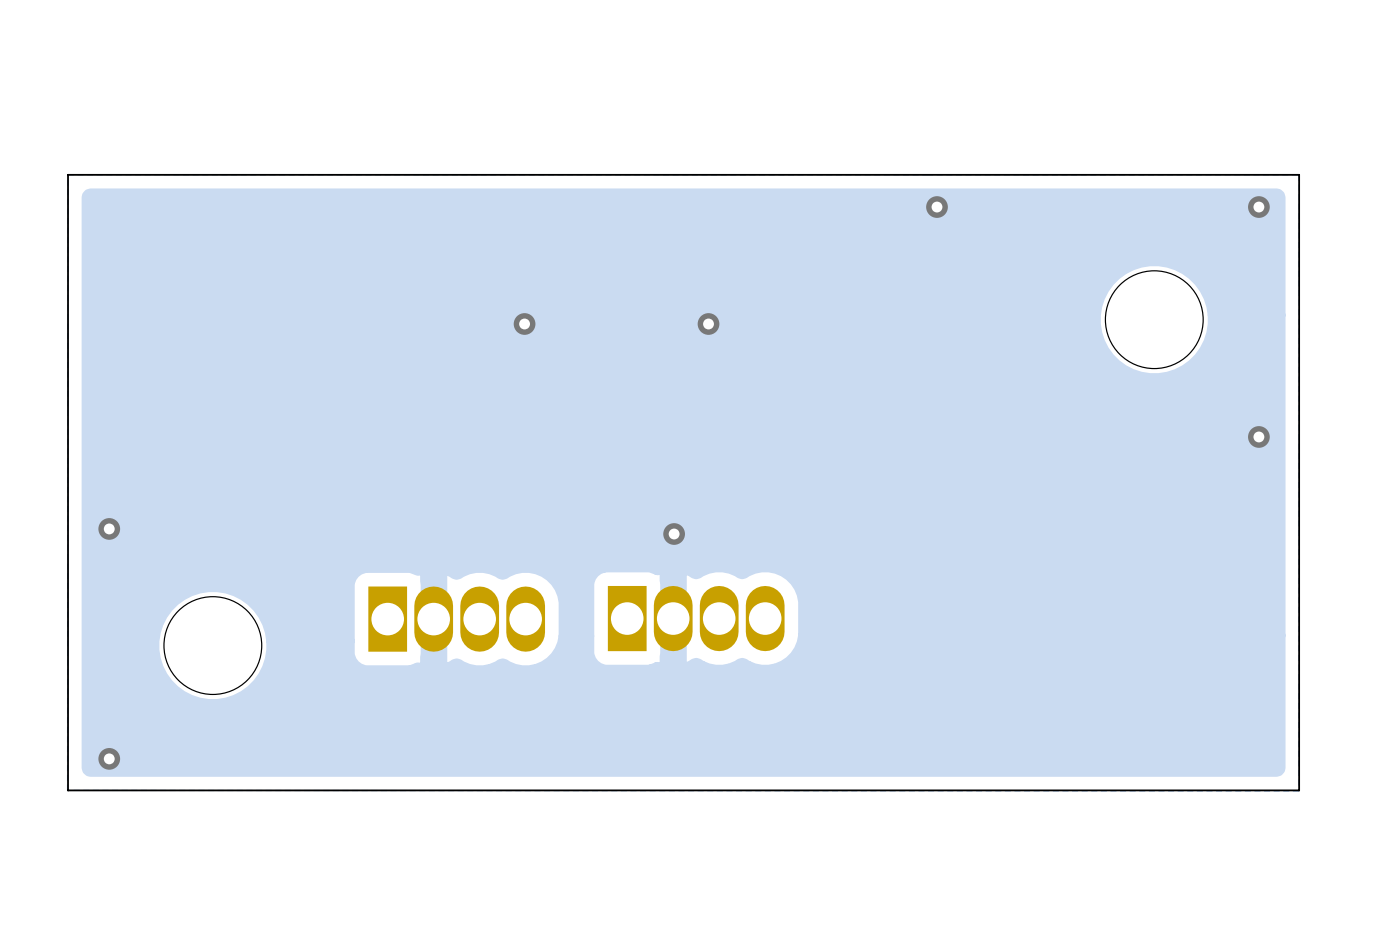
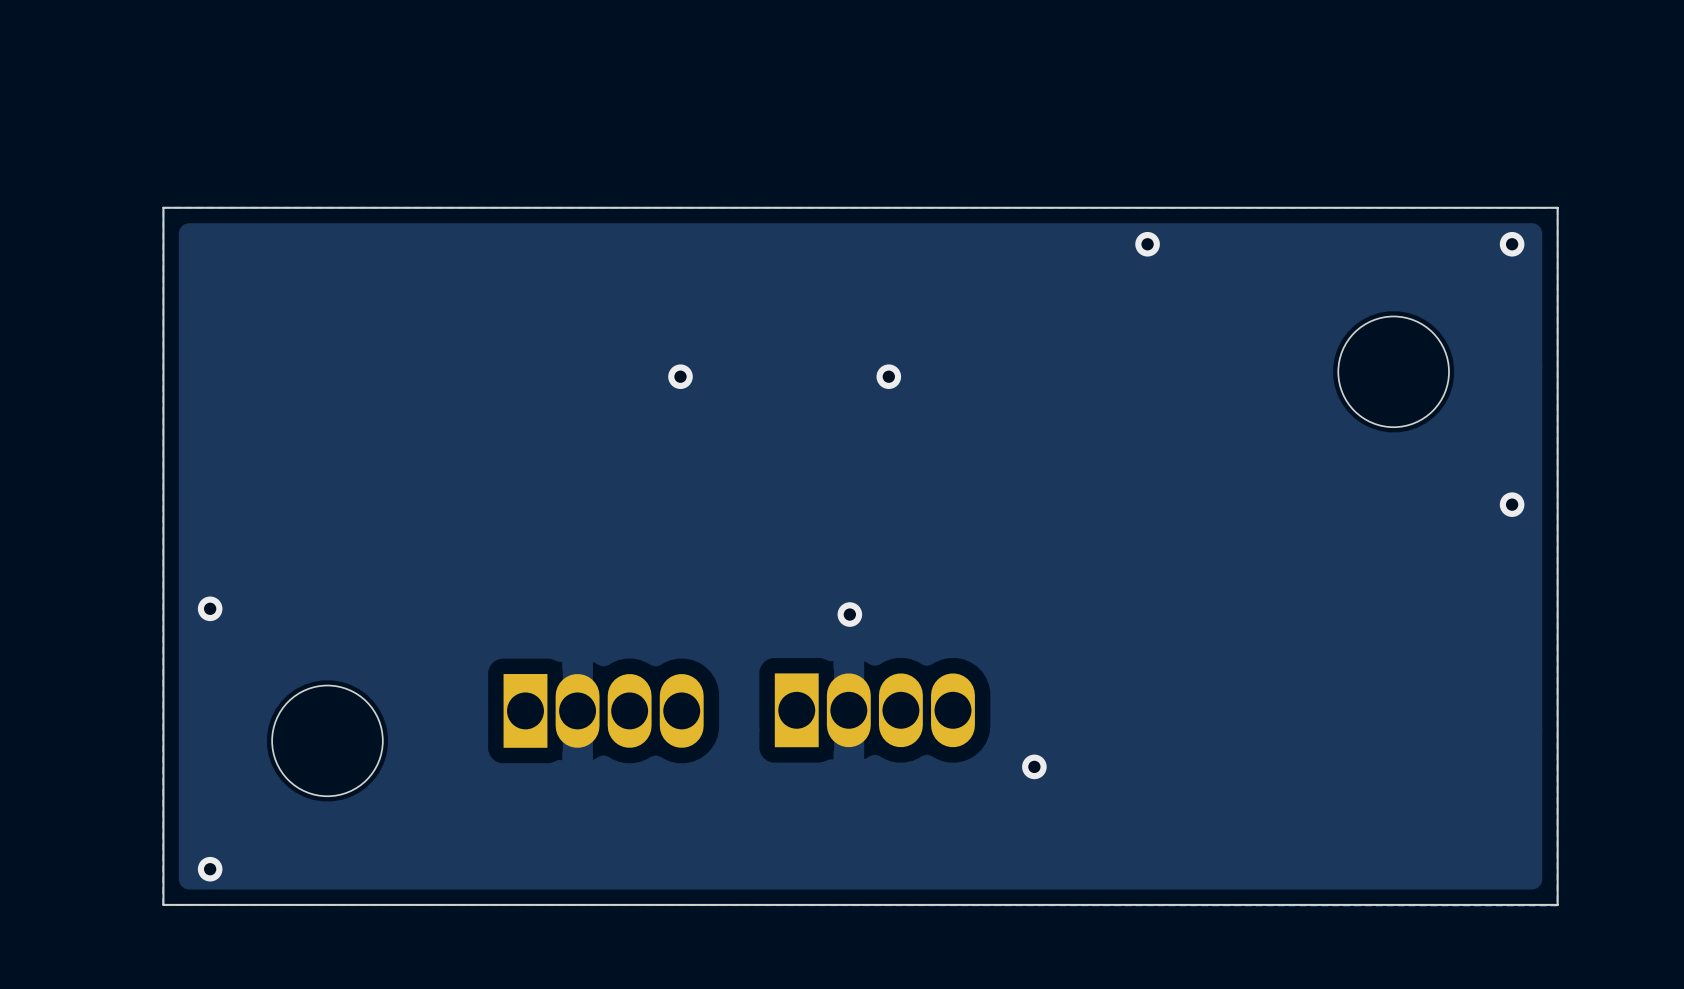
via: none -> (1034, 766)

